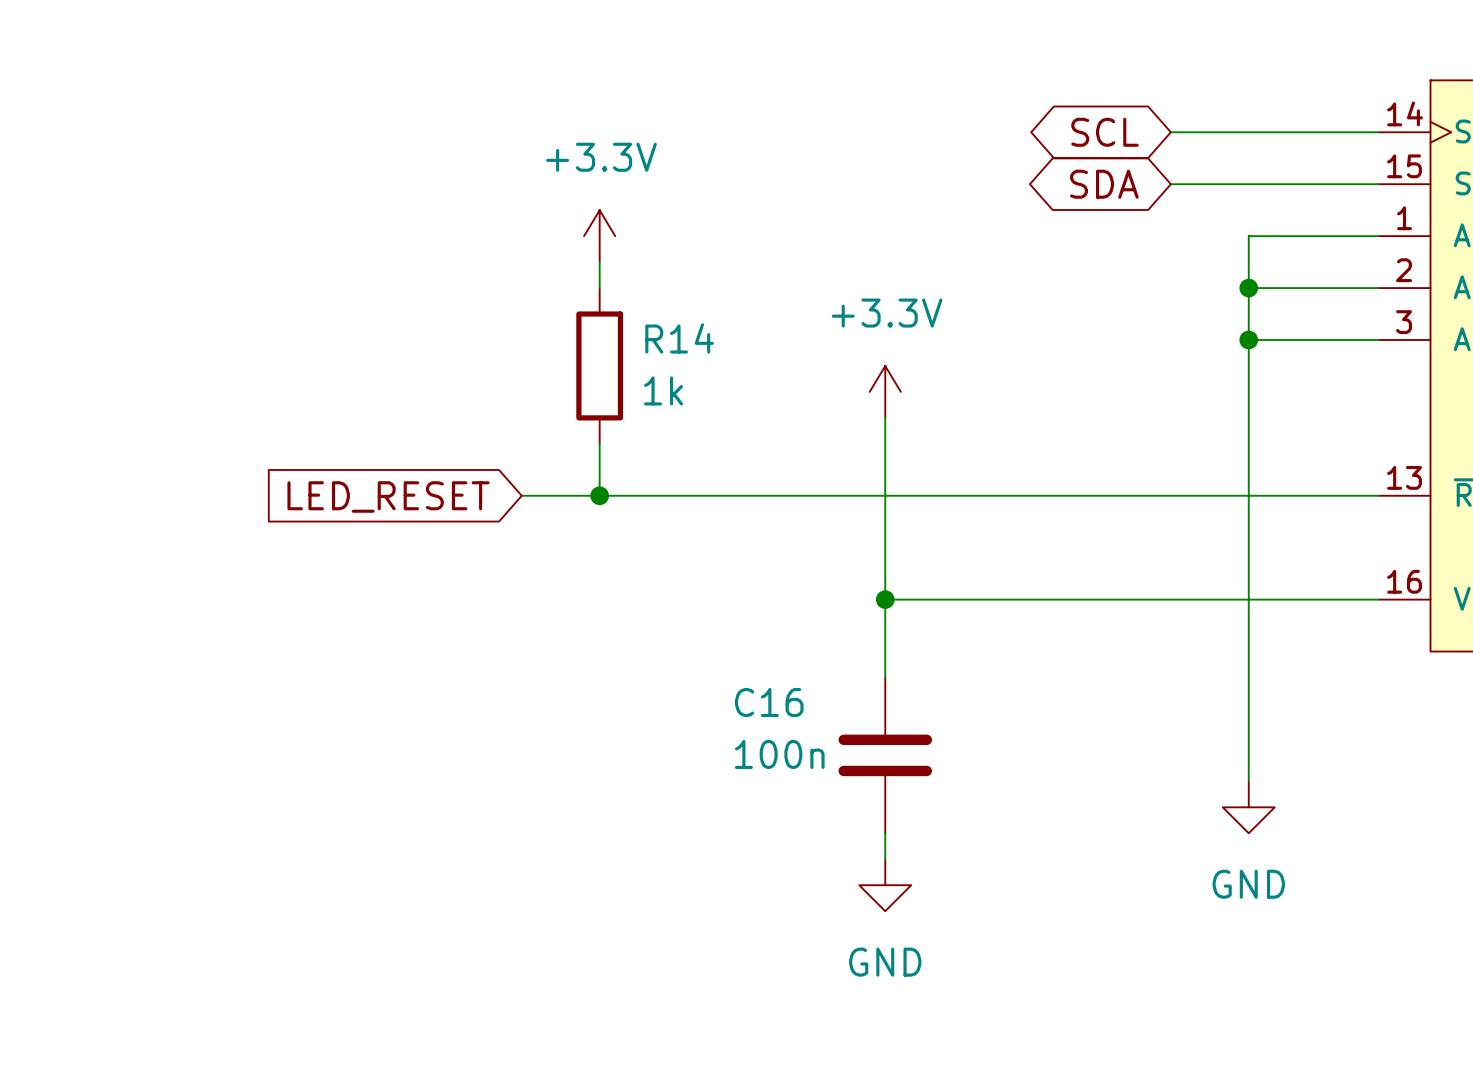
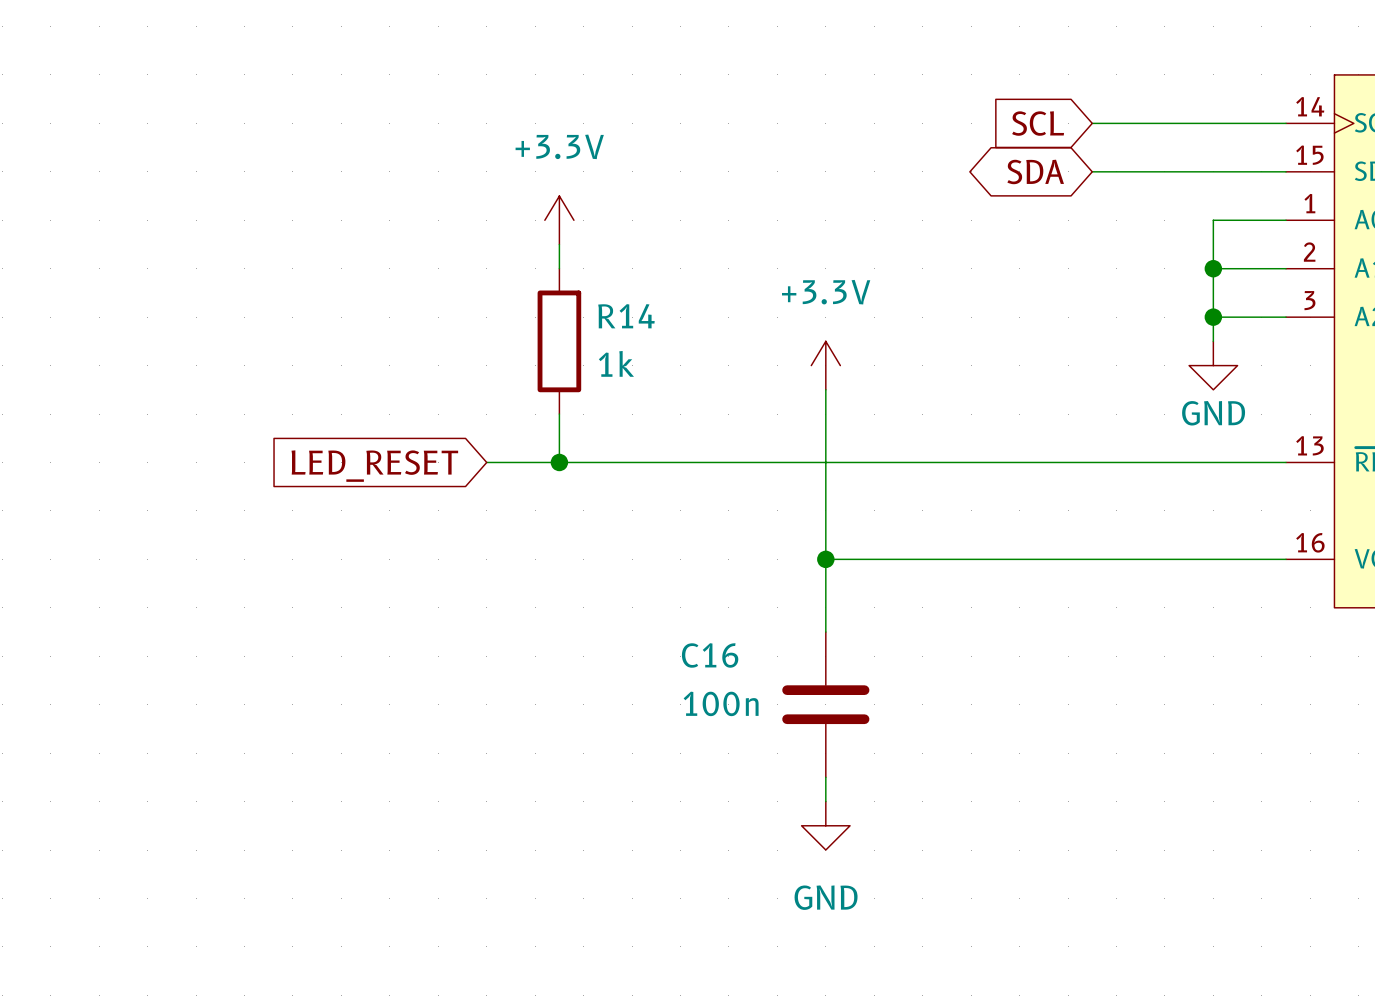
global label shape: bidirectional (1104, 132) -> input (1038, 123)
wire: (1300, 236) (1248, 236) (1248, 781) -> (1213, 220) (1213, 341)
wire: (1248, 288) (1300, 288) -> none
junction: (1248, 288) -> none
junction: none -> (1213, 268)
wire: (1248, 339) (1300, 339) -> none
junction: (1248, 339) -> none
junction: none -> (1213, 317)
power symbol position: GND (1248, 807) -> GND (1213, 365)
power symbol text position: GND (1248, 884) -> GND (1213, 413)

